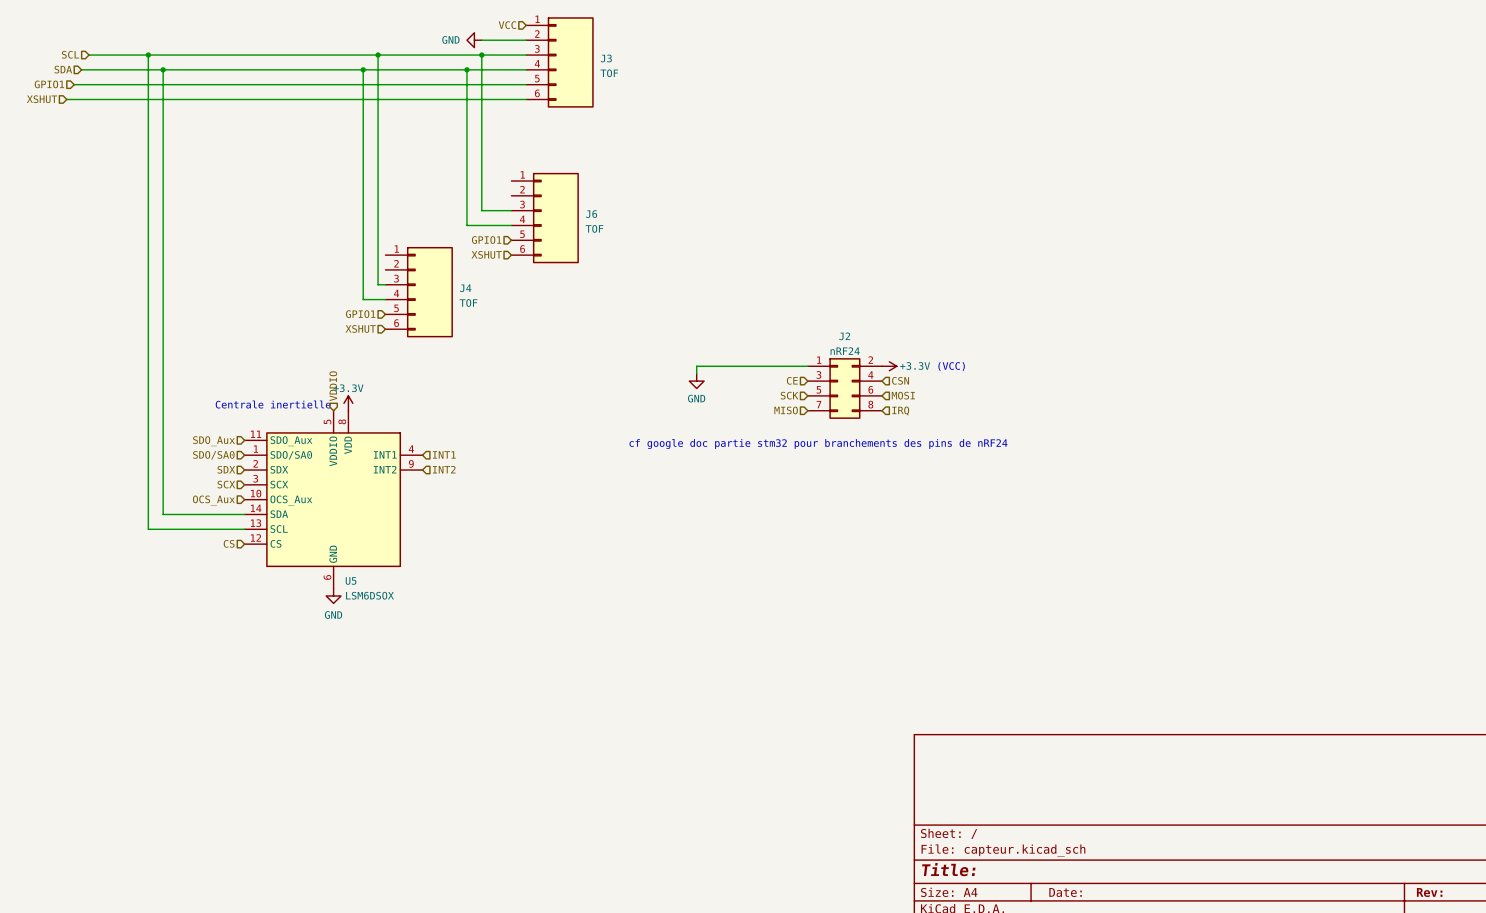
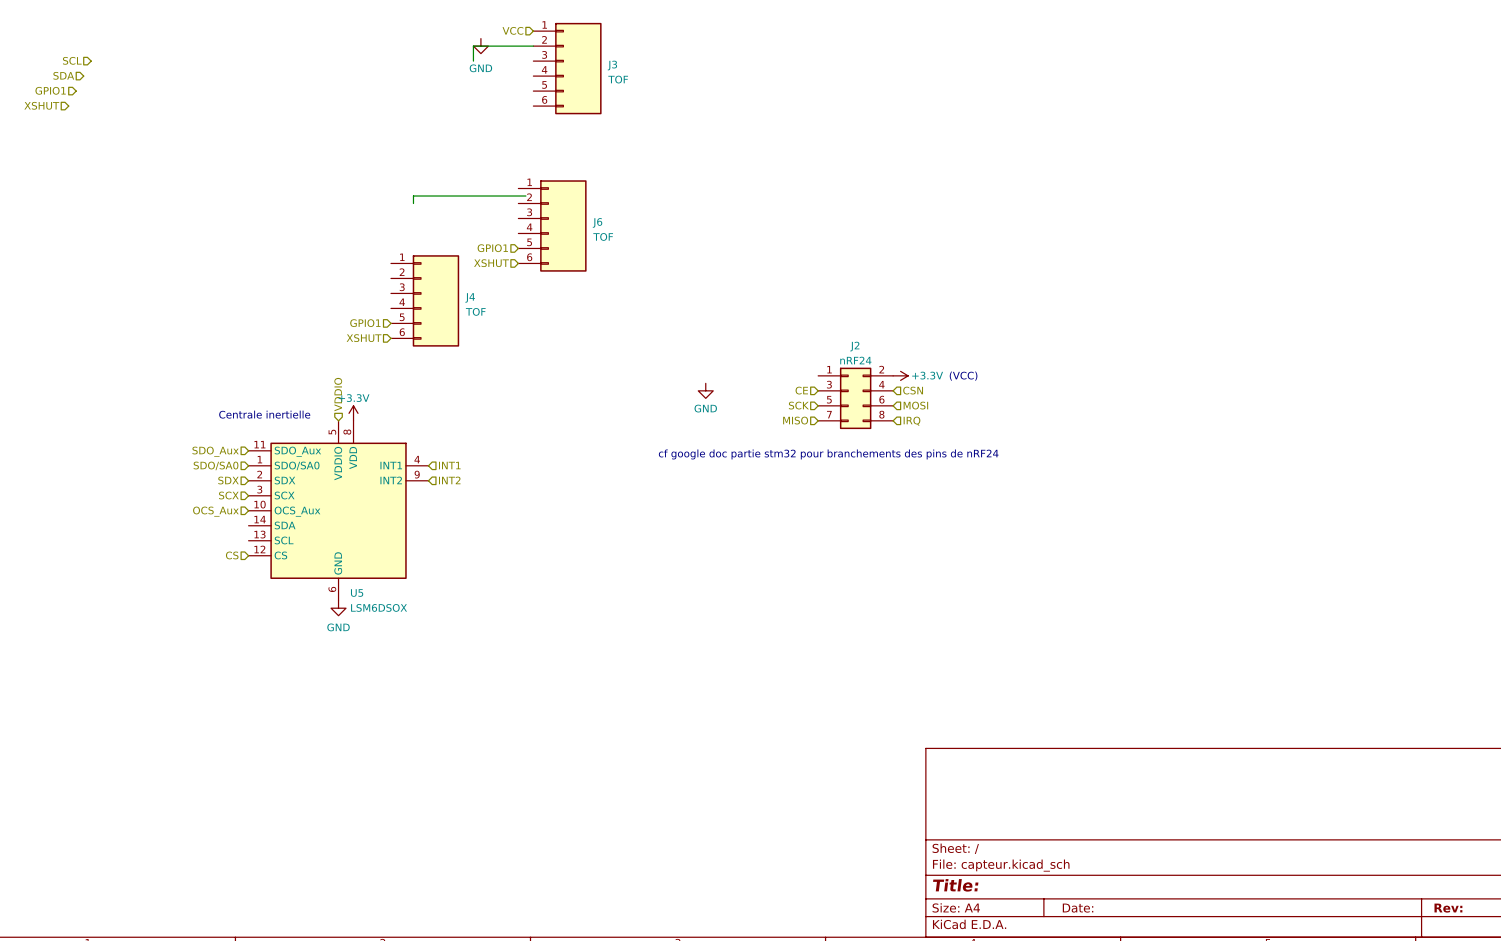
power symbol rotation: 0° (474, 40) -> 90° counterclockwise (480, 46)
wire: none -> (488, 46) (473, 46) (473, 61)
wire: (89, 55) (526, 55) -> none
wire: (148, 55) (148, 529) (244, 529) -> none
junction: (148, 55) -> none
wire: (378, 55) (378, 284) (385, 284) -> none
junction: (378, 55) -> none
wire: (481, 55) (481, 210) (511, 210) -> none
junction: (481, 55) -> none
wire: (81, 69) (526, 69) -> none
wire: (163, 69) (163, 514) (244, 514) -> none
junction: (163, 69) -> none
wire: (363, 69) (363, 299) (385, 299) -> none
junction: (363, 69) -> none
wire: (466, 69) (466, 225) (511, 225) -> none
junction: (466, 69) -> none
wire: (74, 84) (526, 84) -> none
wire: (66, 99) (526, 99) -> none
wire: none -> (525, 196) (413, 196) (413, 203)
wire: (807, 366) (696, 366) (696, 373) -> none

